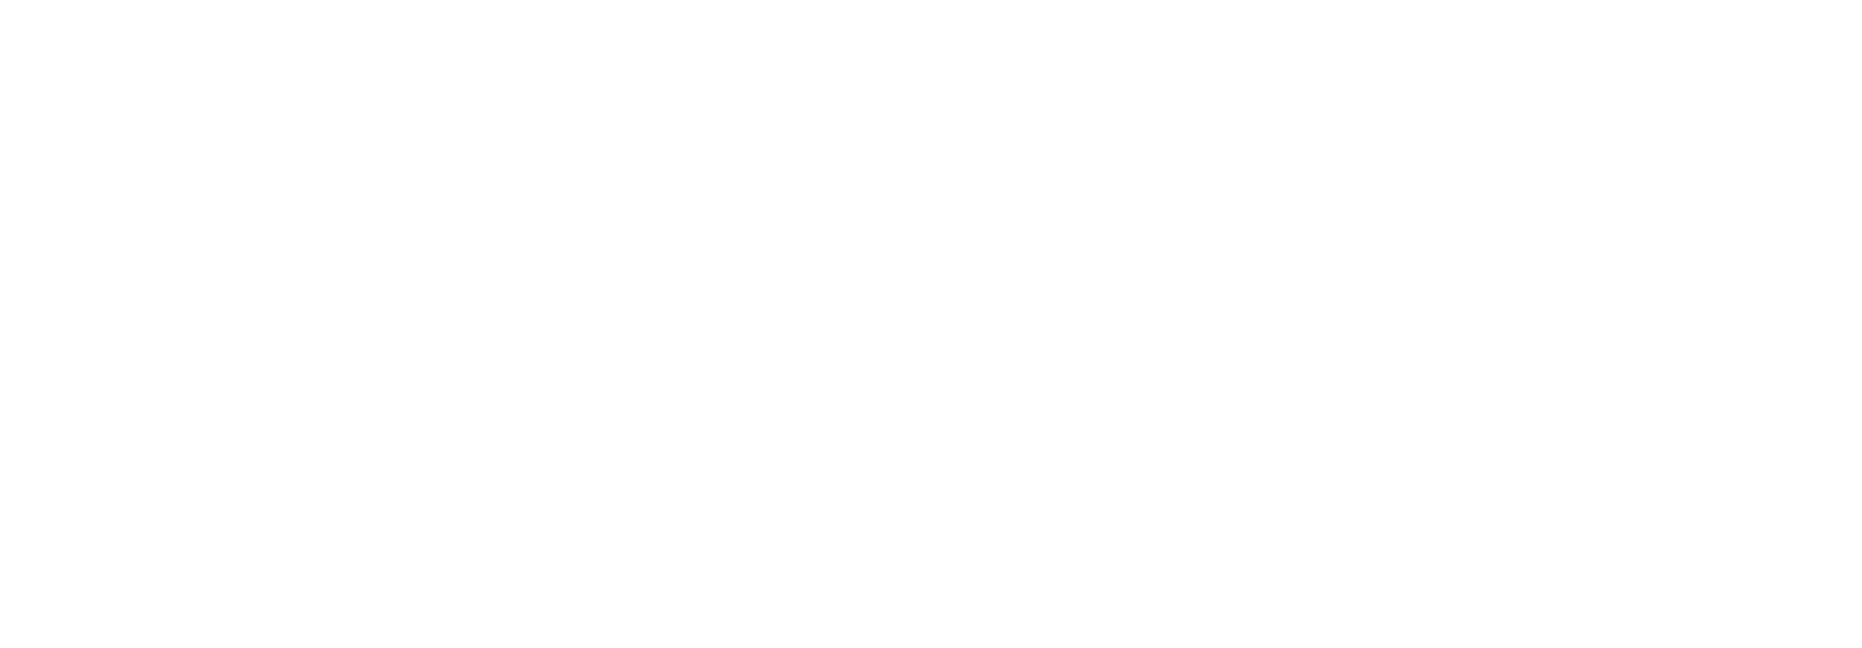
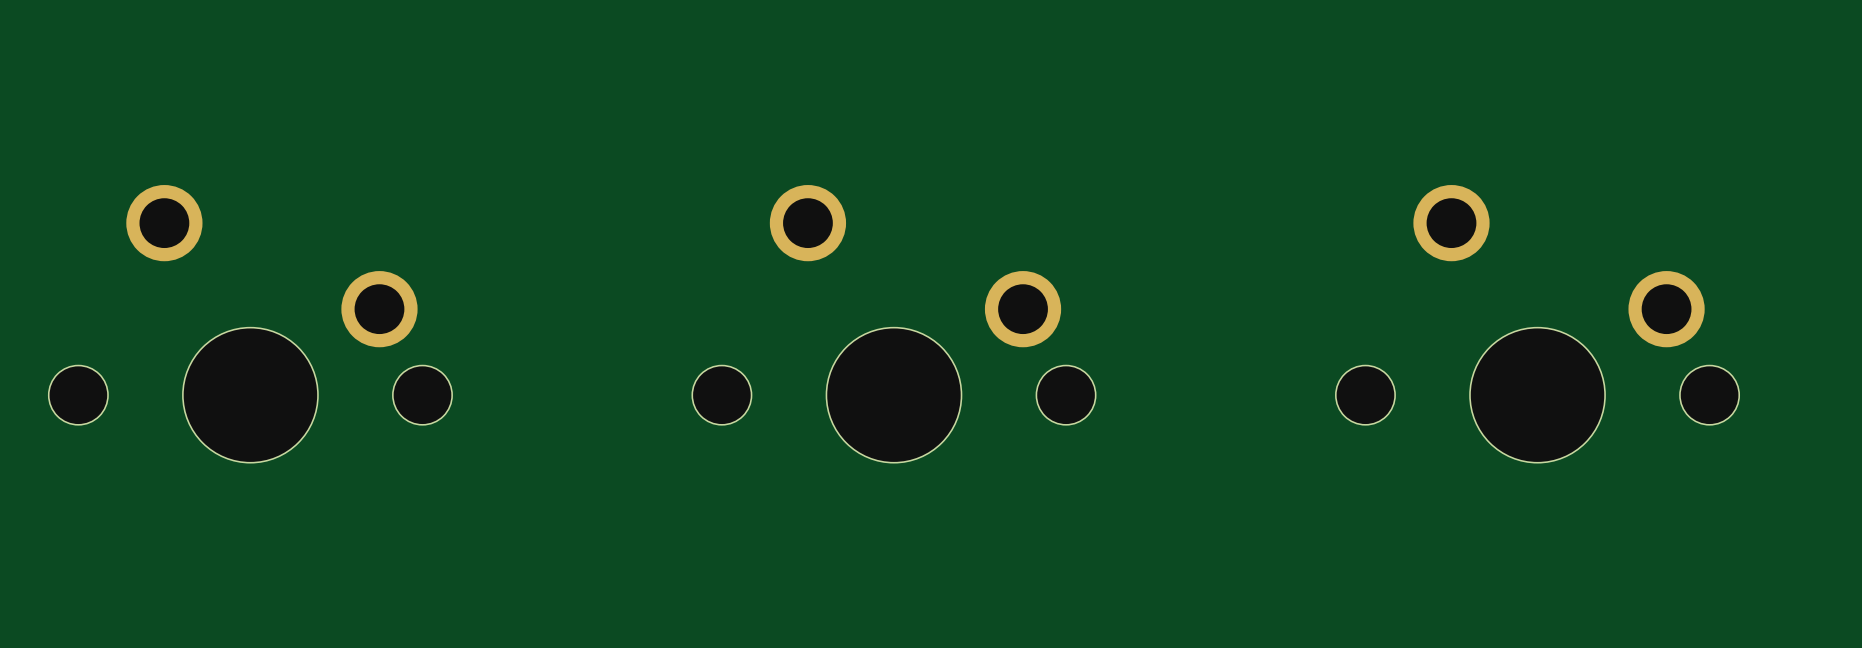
part: none -> (250, 323)
part: none -> (893, 323)
part: none -> (1537, 323)

